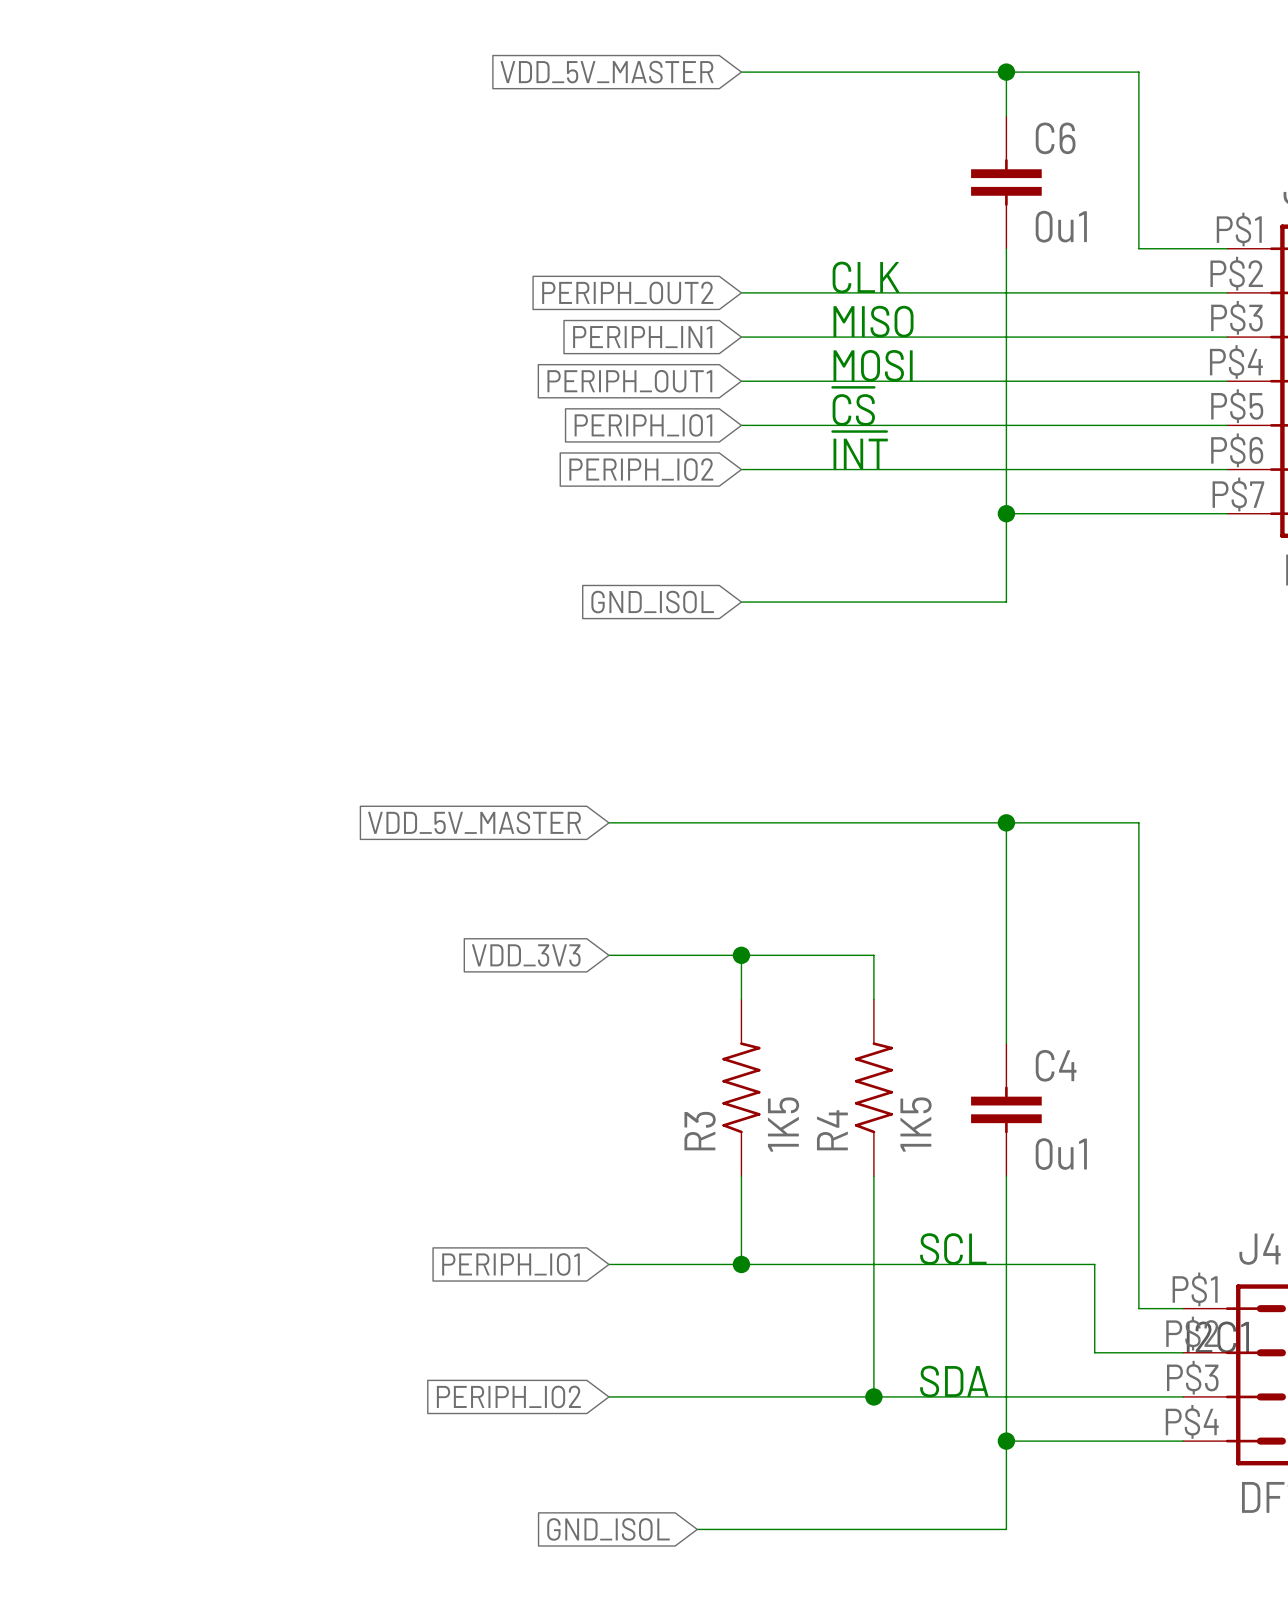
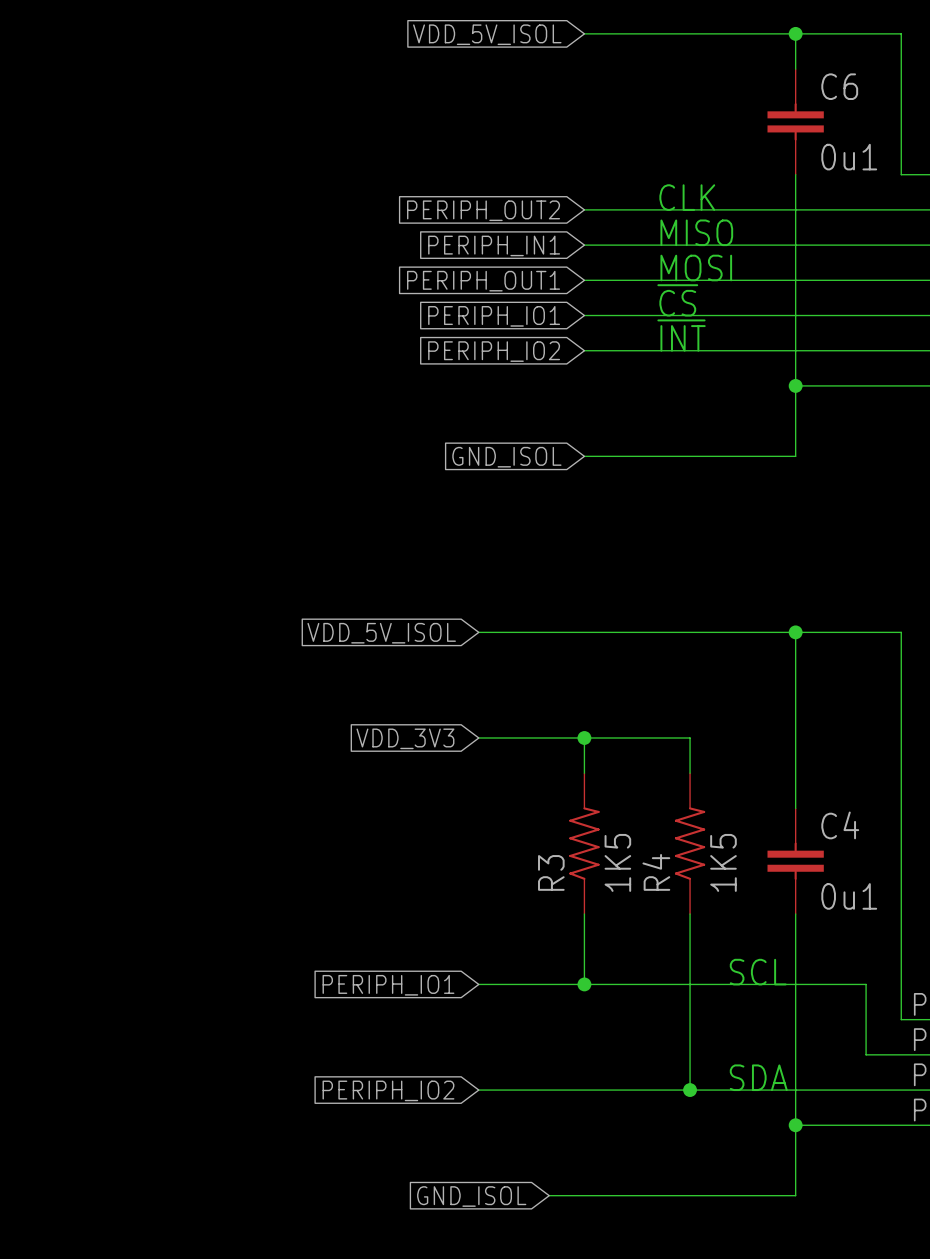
global label: VDD_5V_MASTER (607, 72) -> VDD_5V_ISOL (487, 34)
global label: VDD_5V_MASTER (474, 822) -> VDD_5V_ISOL (381, 633)

